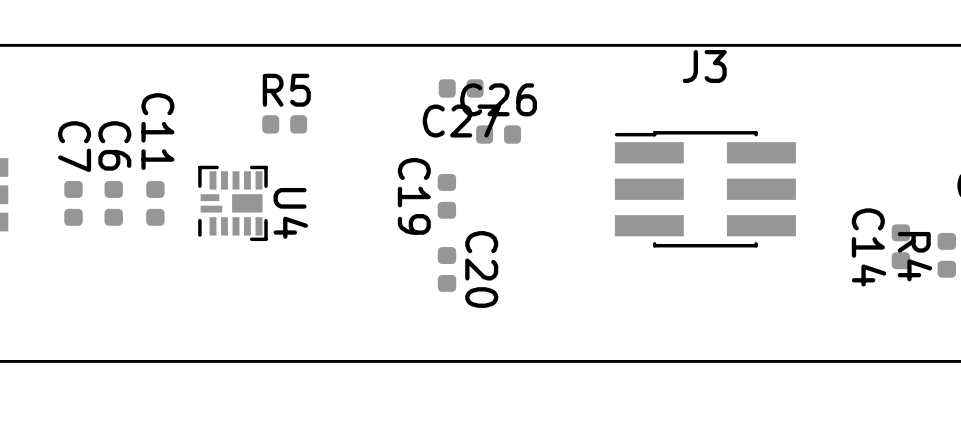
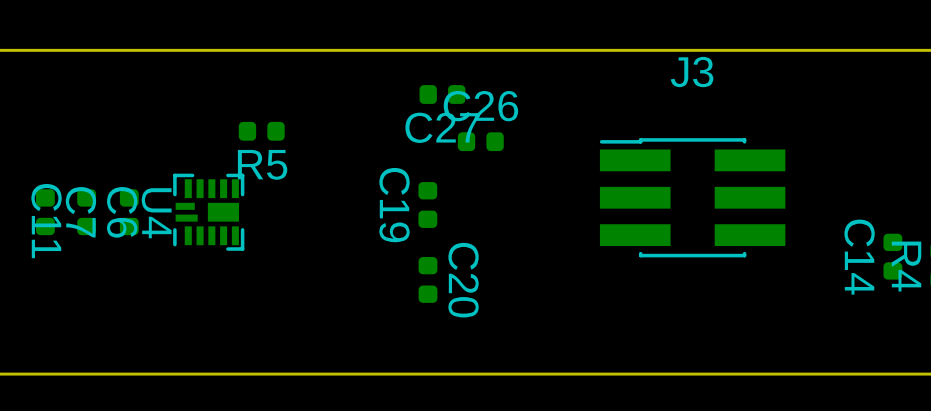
R5 name position: R5 (286, 90) -> R5 (262, 164)
C11 name position: C11 (157, 131) -> C11 (46, 221)
C6 name position: C6 (114, 145) -> C6 (122, 212)
C7 name position: C7 (74, 146) -> C7 (80, 212)
U4 name position: U4 (290, 213) -> U4 (156, 213)

